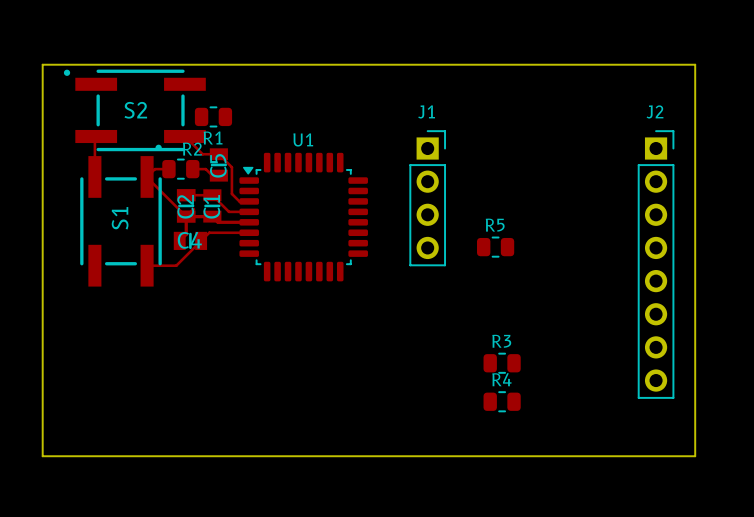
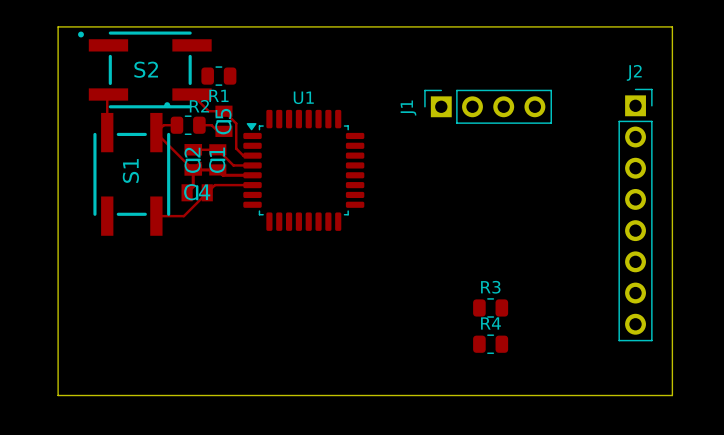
J1 rotation: 0° (427, 198) -> 90° counterclockwise (488, 106)
J1 position: (427, 198) -> (488, 106)
R5: (495, 247) -> none

